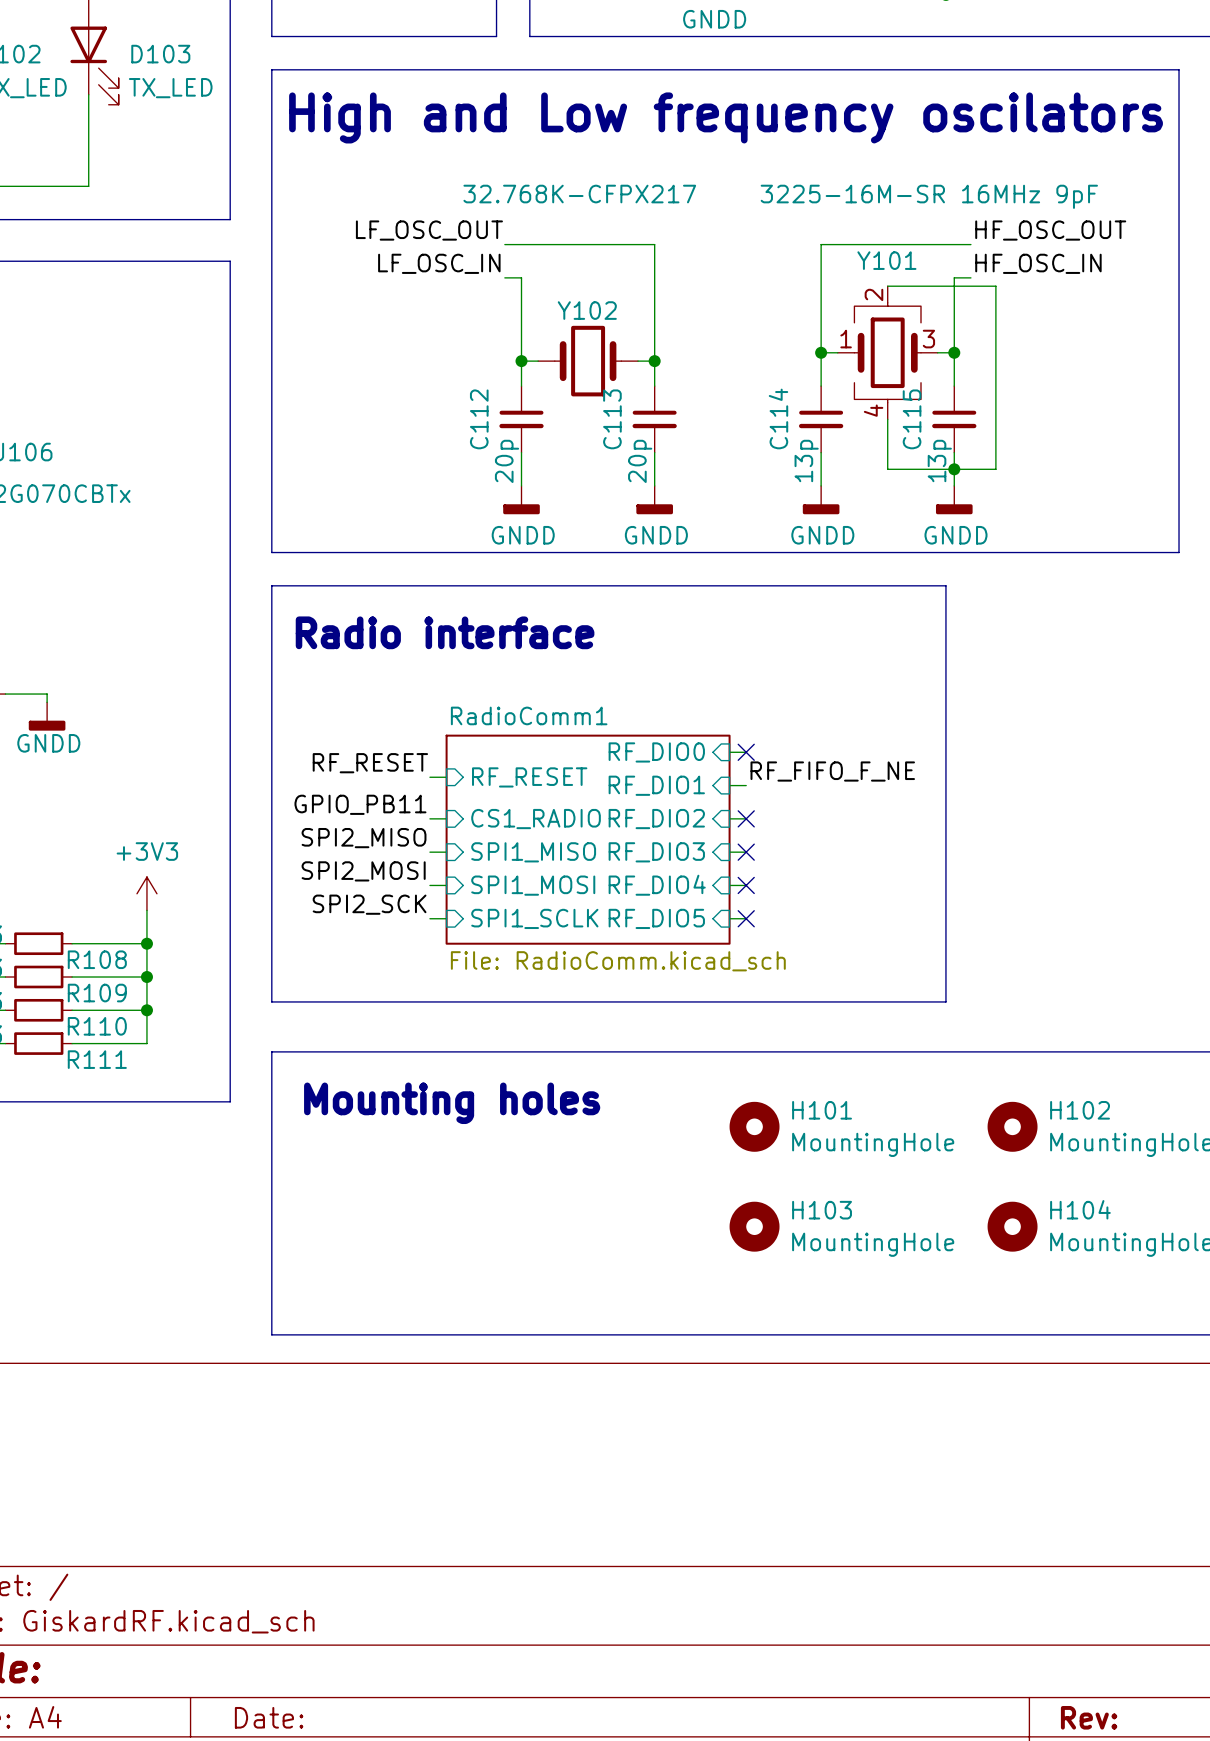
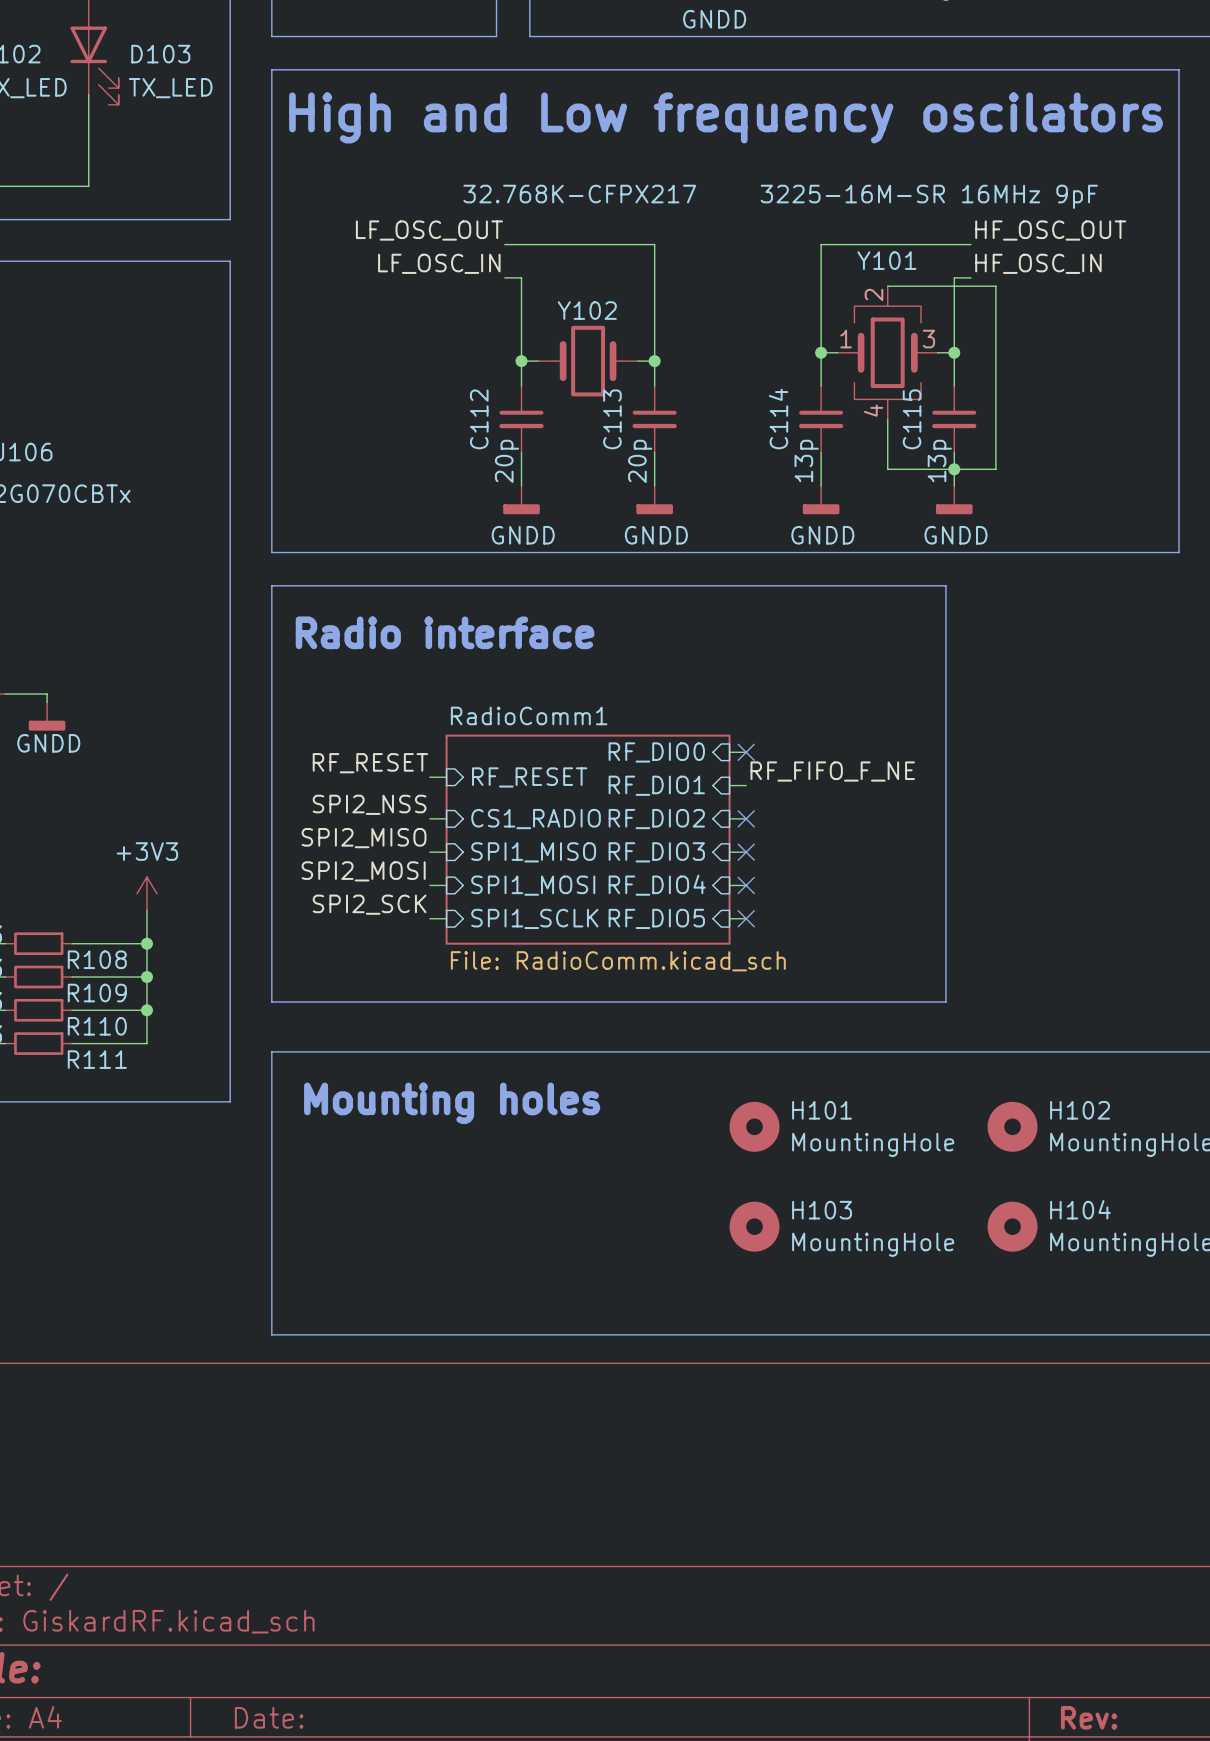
label: GPIO_PB11 (360, 804) -> SPI2_NSS (369, 804)

